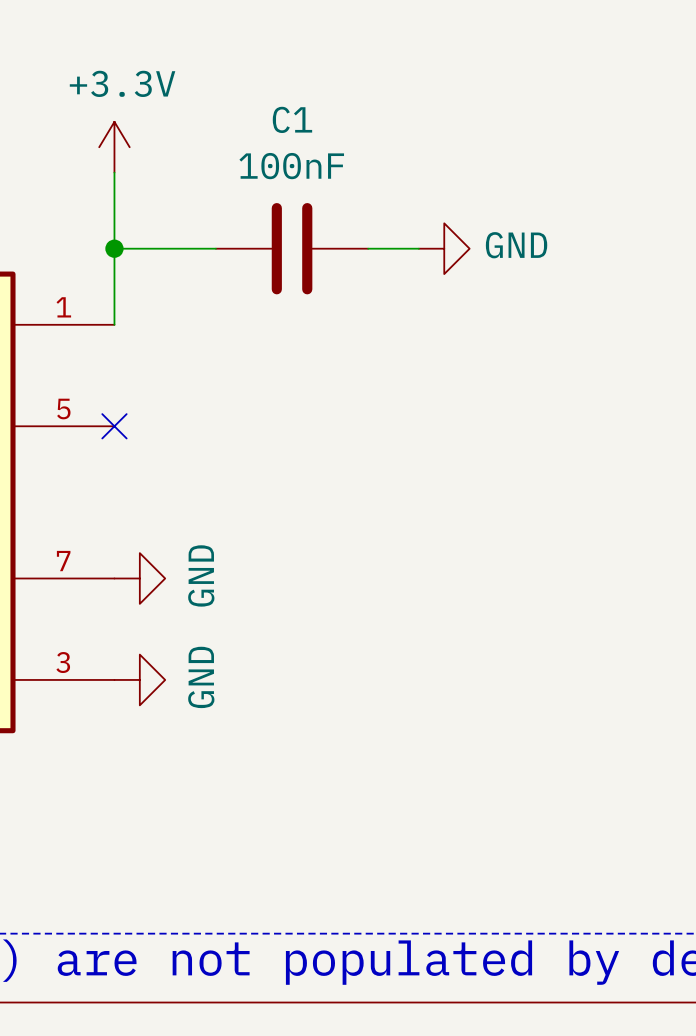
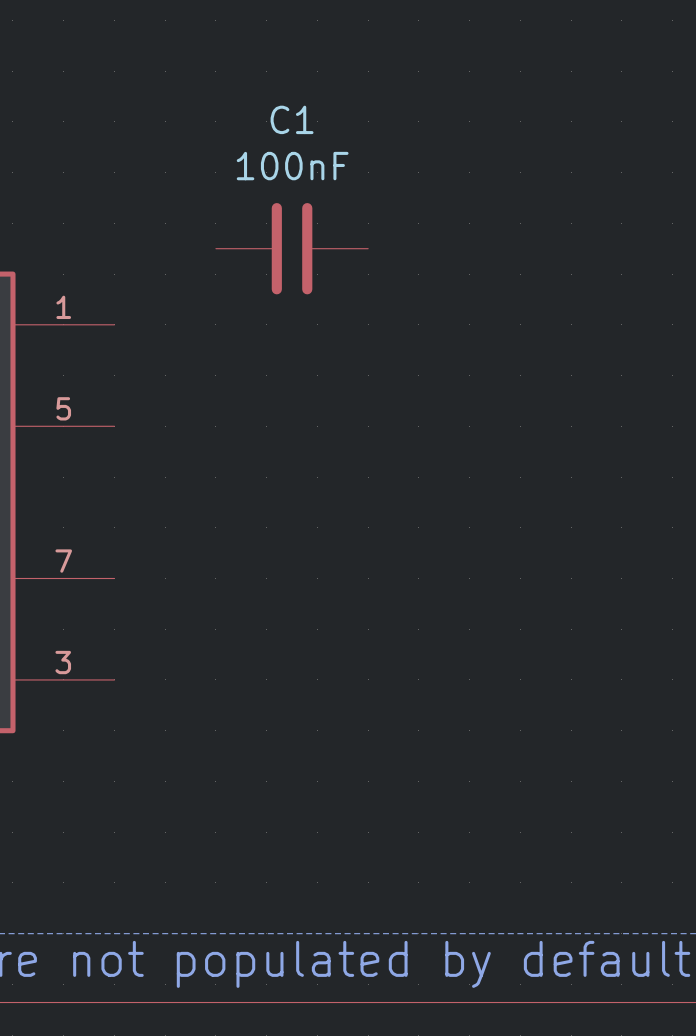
power symbol: +3.3V (114, 147) -> none
wire: (114, 172) (114, 324) -> none
wire: (114, 248) (215, 248) -> none
junction: (114, 248) -> none
wire: (368, 248) (418, 248) -> none
power symbol: GND (444, 248) -> none
no-connect mark: (114, 426) -> none
power symbol: GND (139, 578) -> none
power symbol: GND (139, 679) -> none

